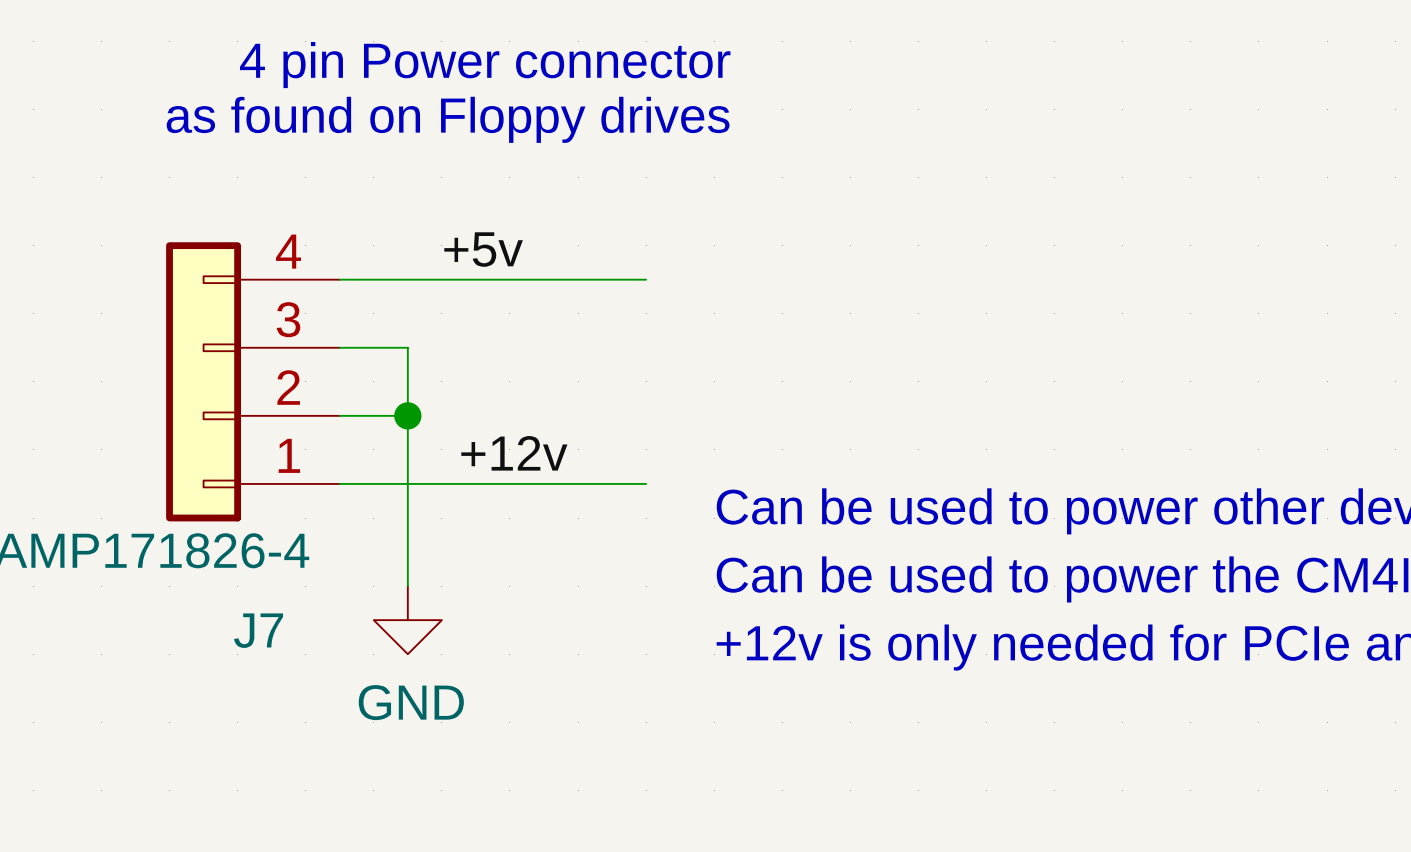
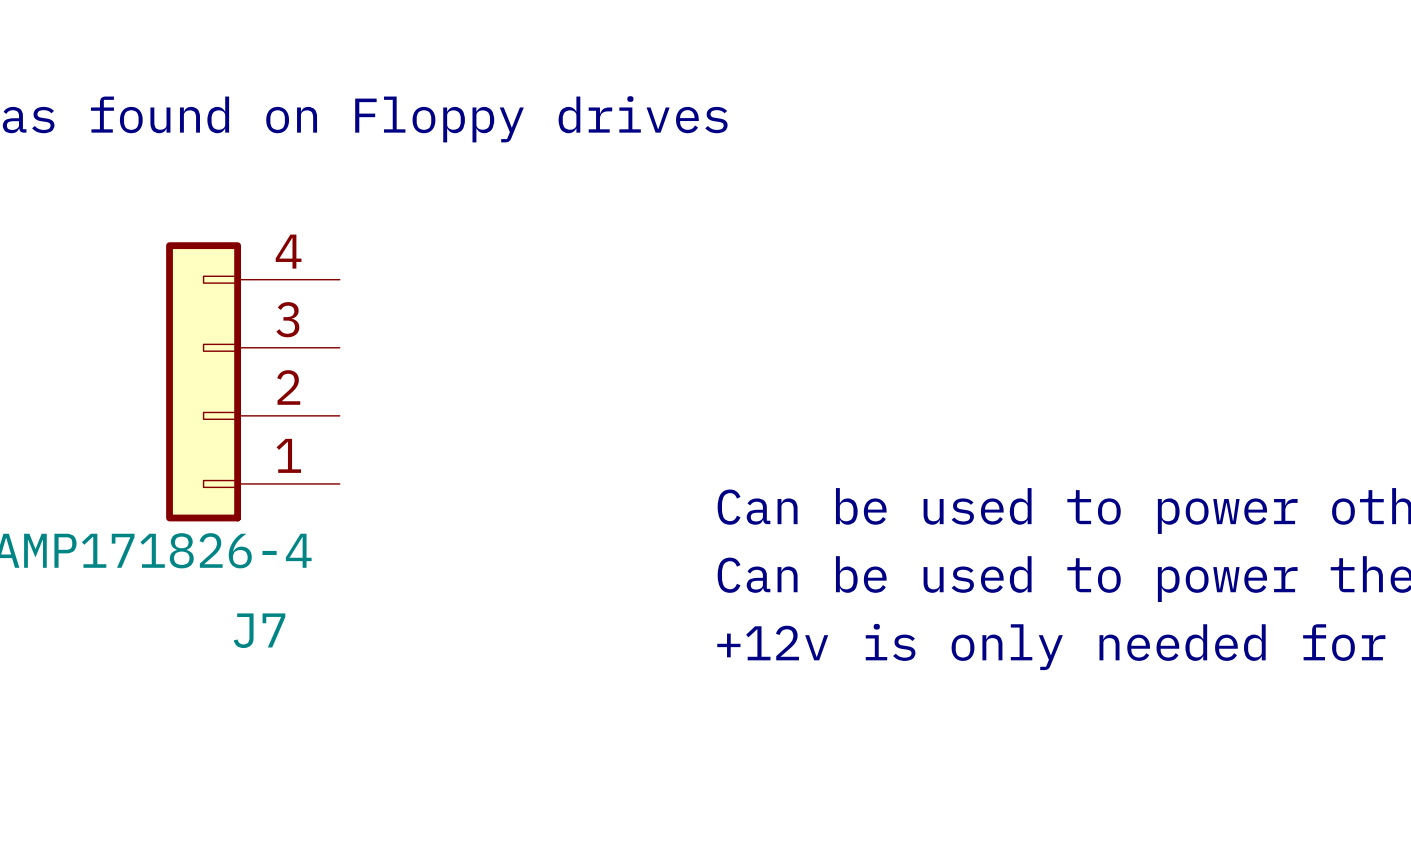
text: 4 pin Power connector (485, 65) -> none
label: +5v (483, 249) -> none
wire: (339, 279) (646, 279) -> none
wire: (339, 347) (407, 347) (407, 586) -> none
wire: (339, 415) (407, 415) -> none
junction: (407, 415) -> none
label: +12v (514, 453) -> none
wire: (339, 483) (646, 483) -> none
power symbol: GND (407, 620) -> none

